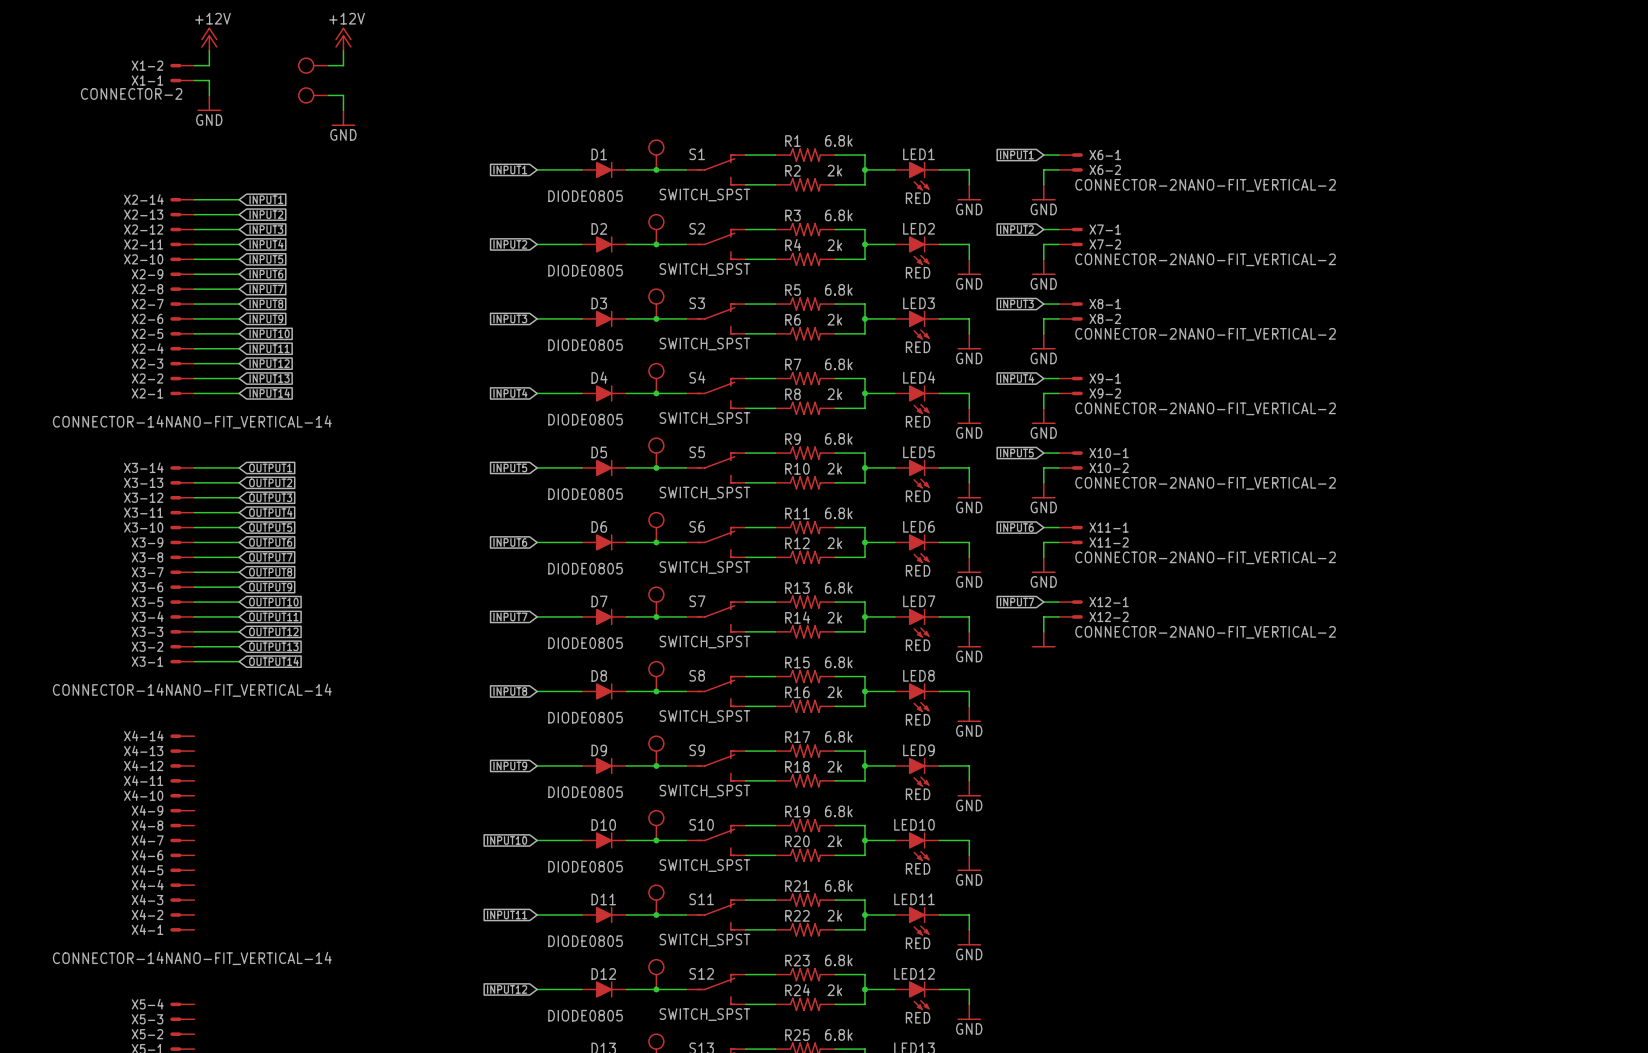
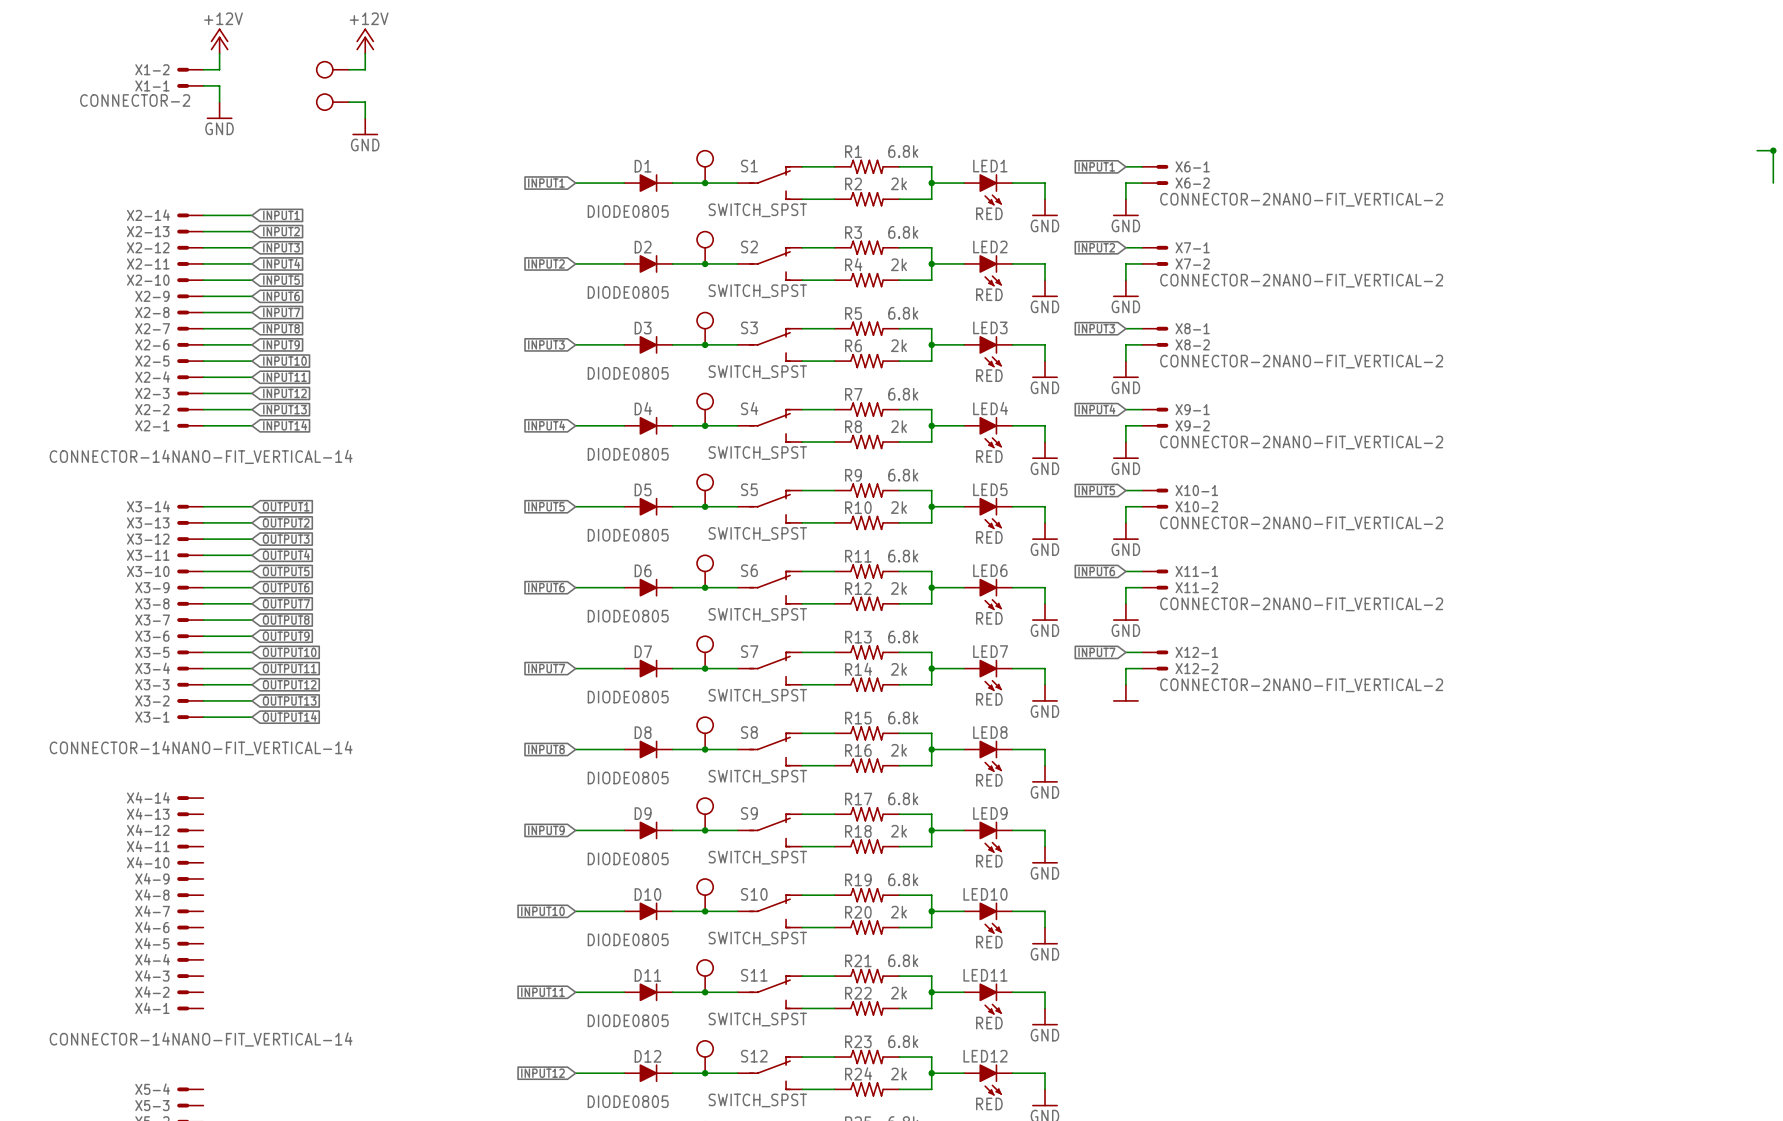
wire: none -> (1757, 150) (1773, 150) (1773, 183)
junction: none -> (1773, 150)

